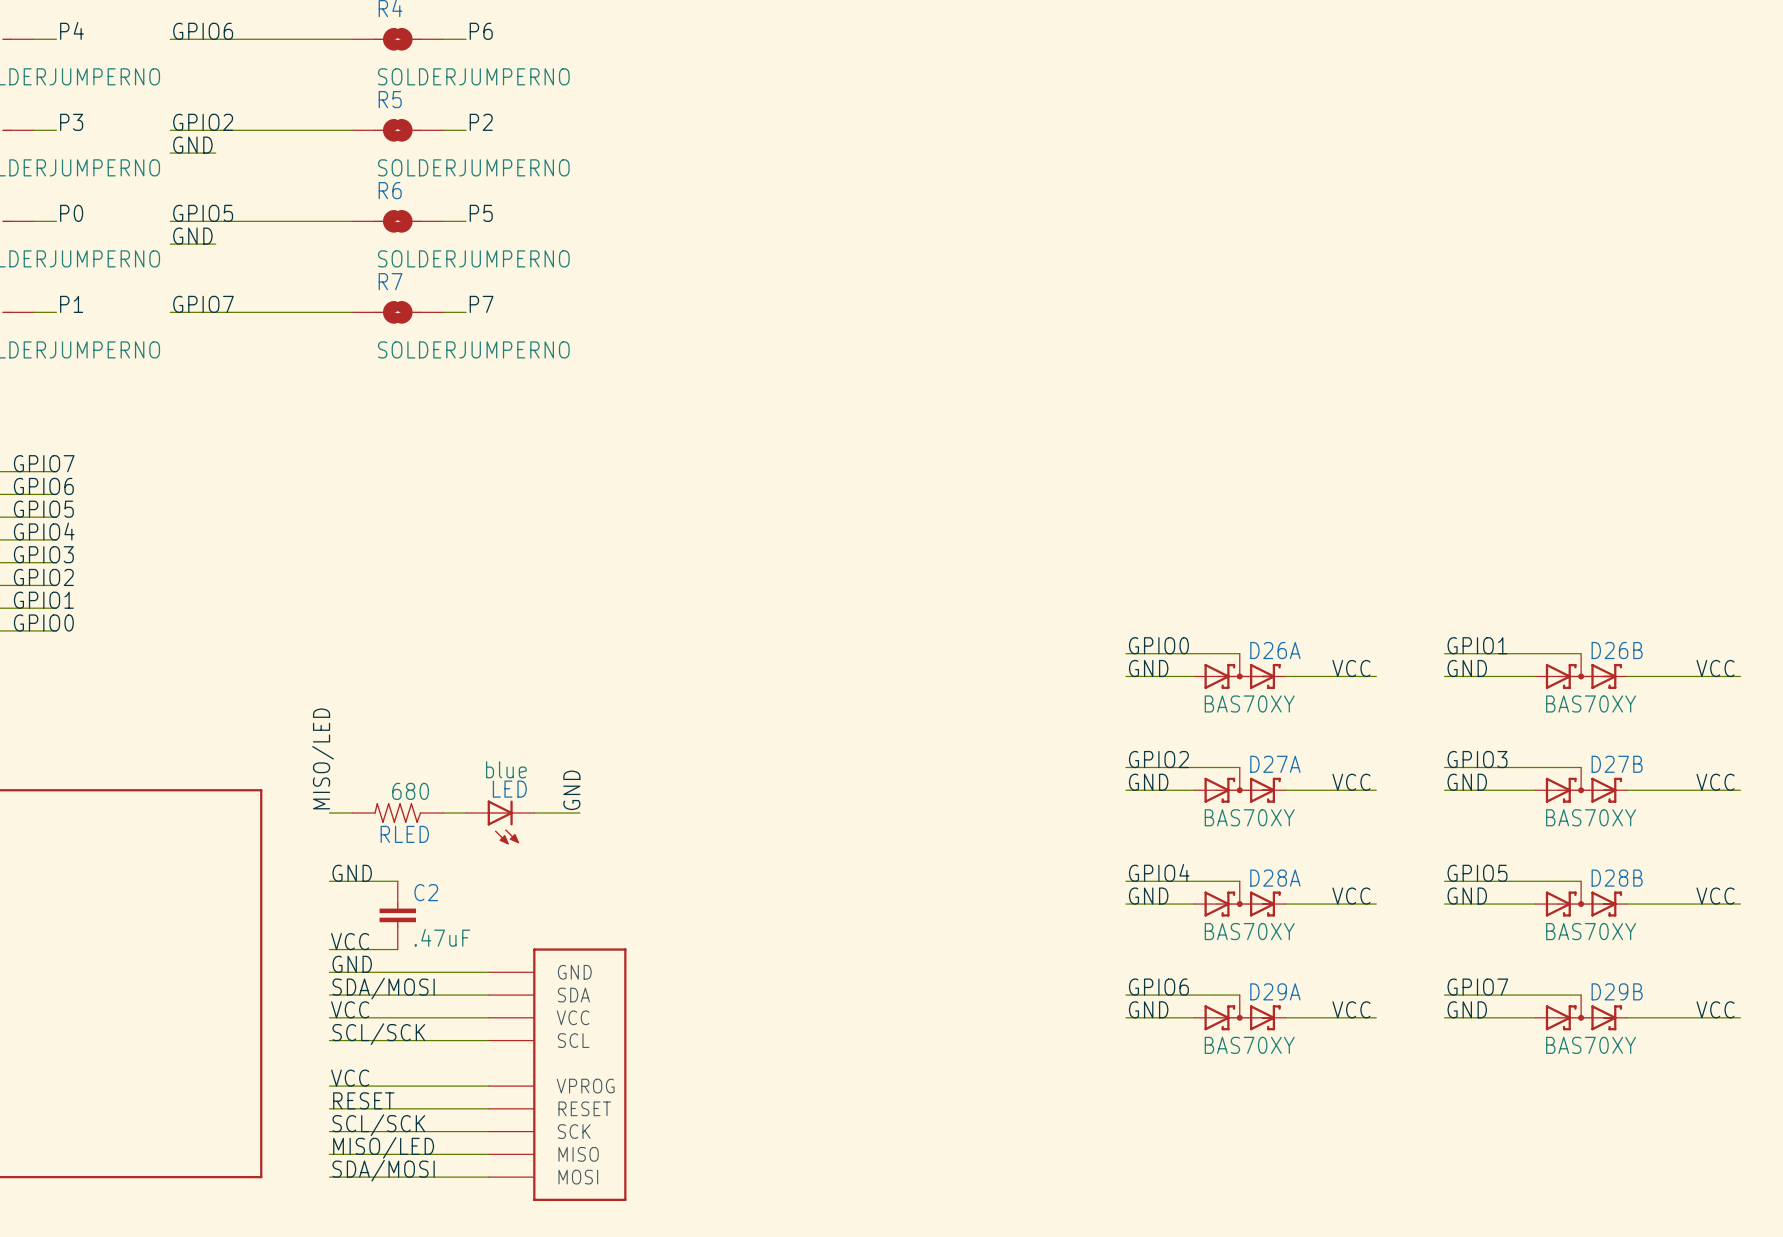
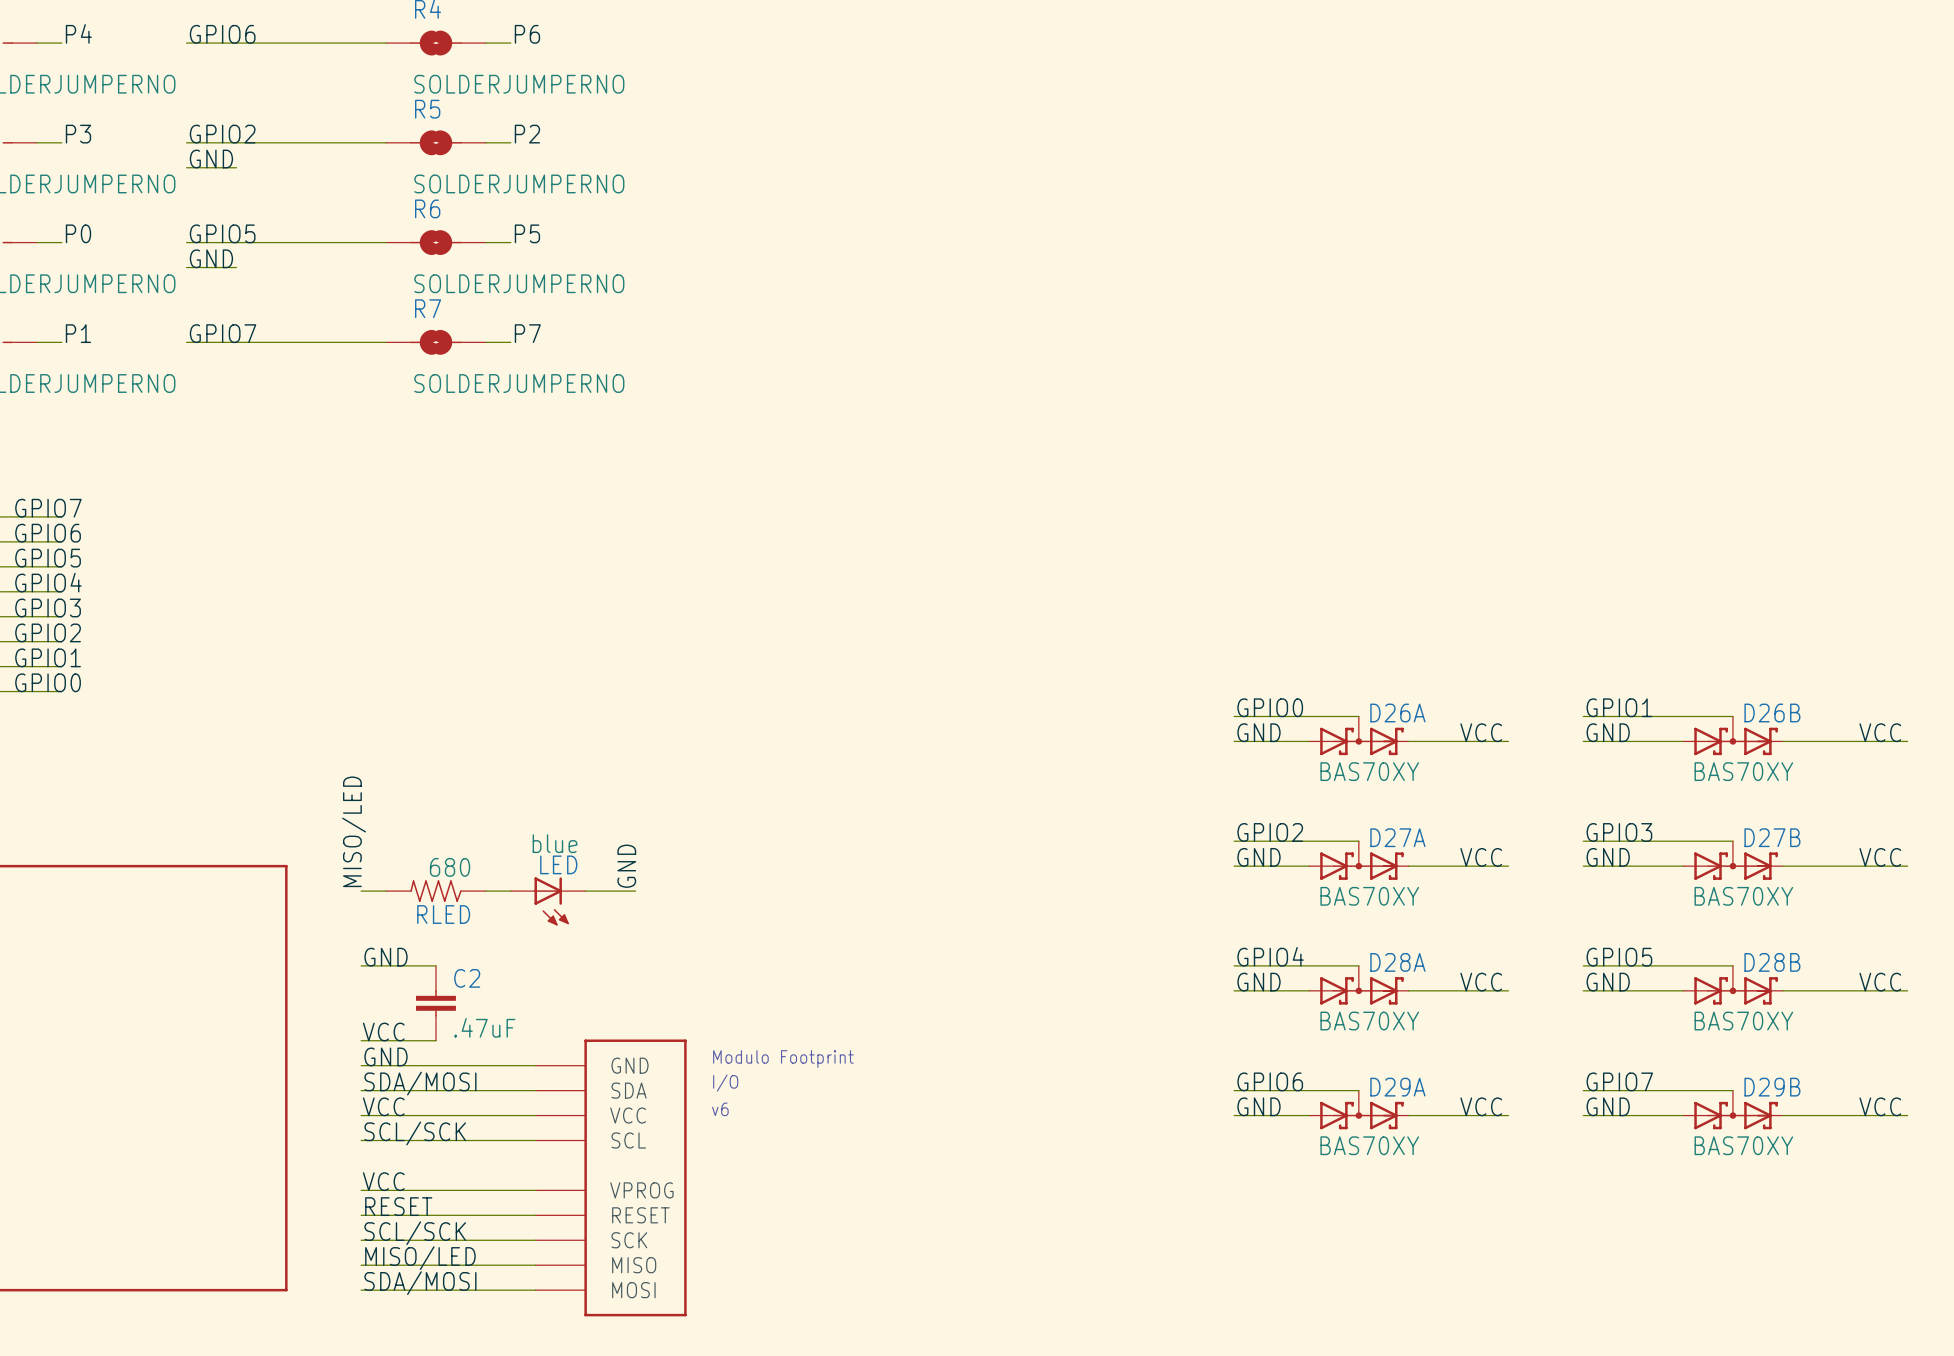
part text: none -> Modulo Footprint (783, 1059)
part text: none -> I/O (725, 1083)
part text: none -> v6 (720, 1109)

